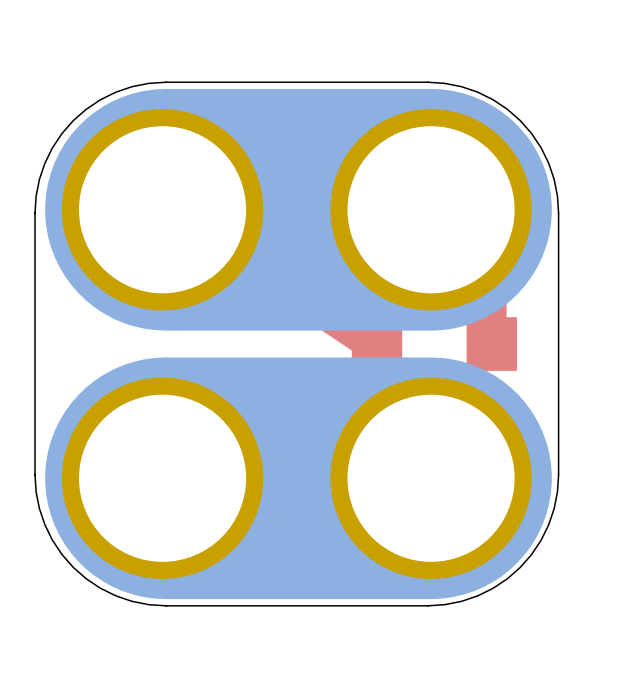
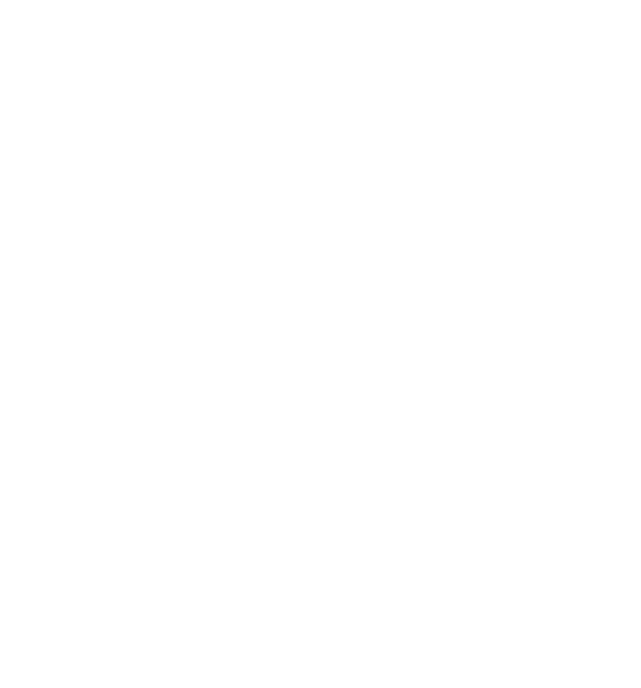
part: (296, 344) -> none

